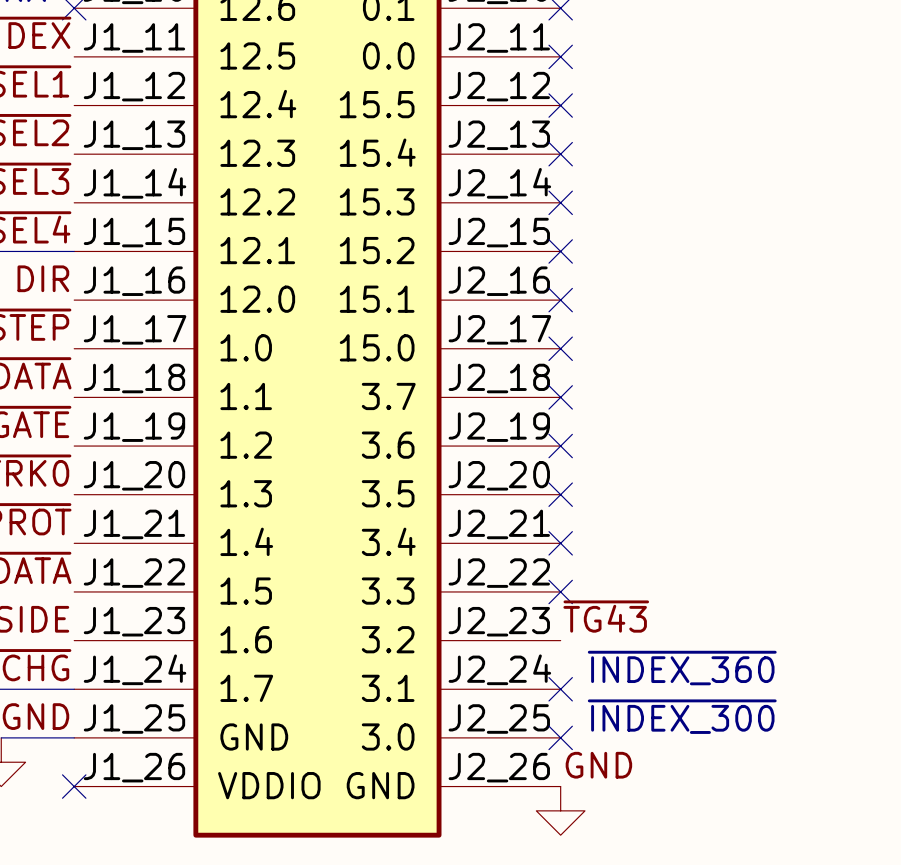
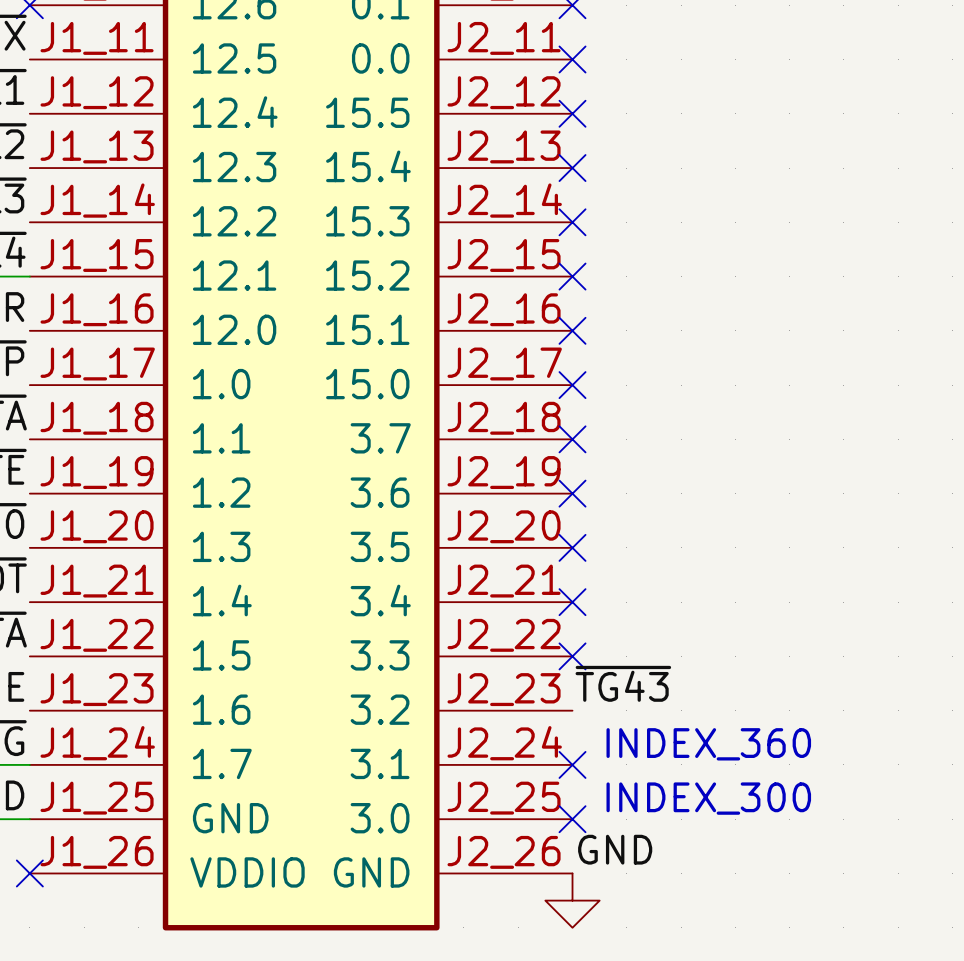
text: ~{INDEX_360} (682, 668) -> INDEX_360 (708, 744)
text: ~{INDEX_300} (682, 716) -> INDEX_300 (708, 798)

